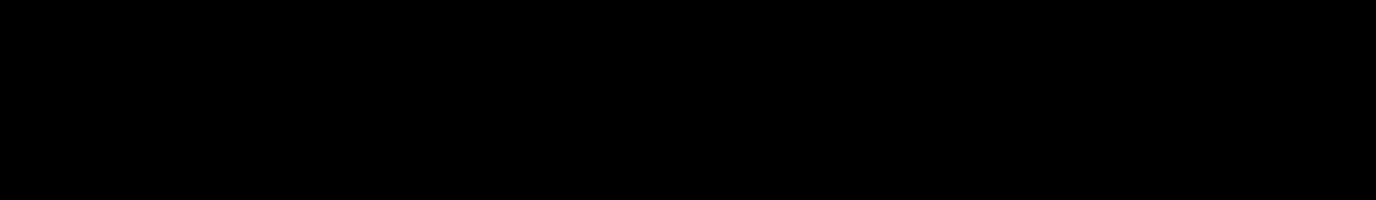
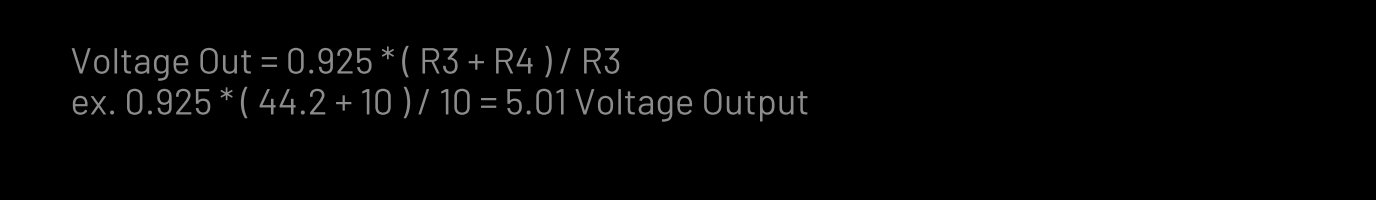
text: none -> Voltage Out = 0.925 * ( R3 + R4 ) / R3 (345, 63)
text: none -> ex. 0.925 * ( 44.2 + 10 ) / 10 = 5.01 Voltage Output (440, 104)

